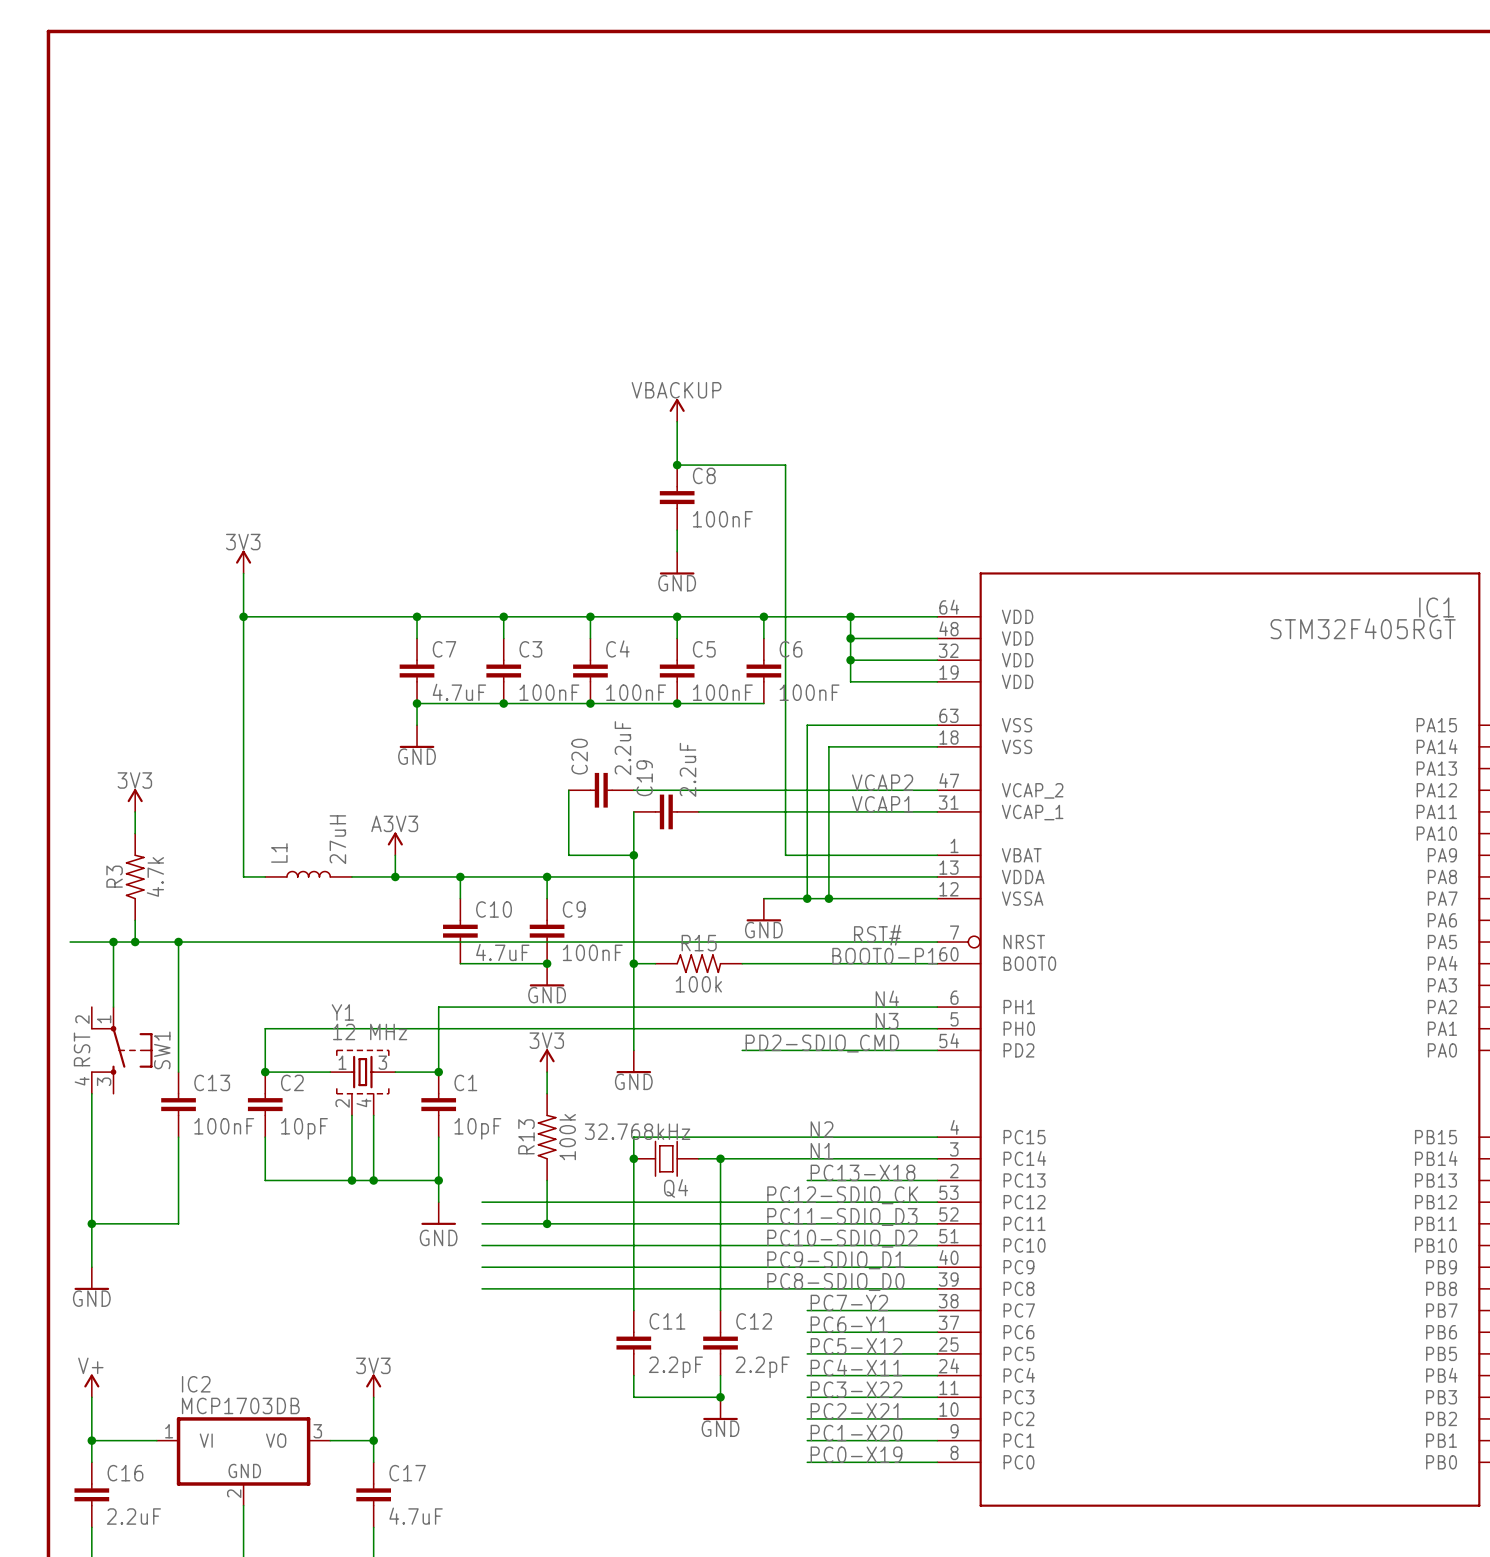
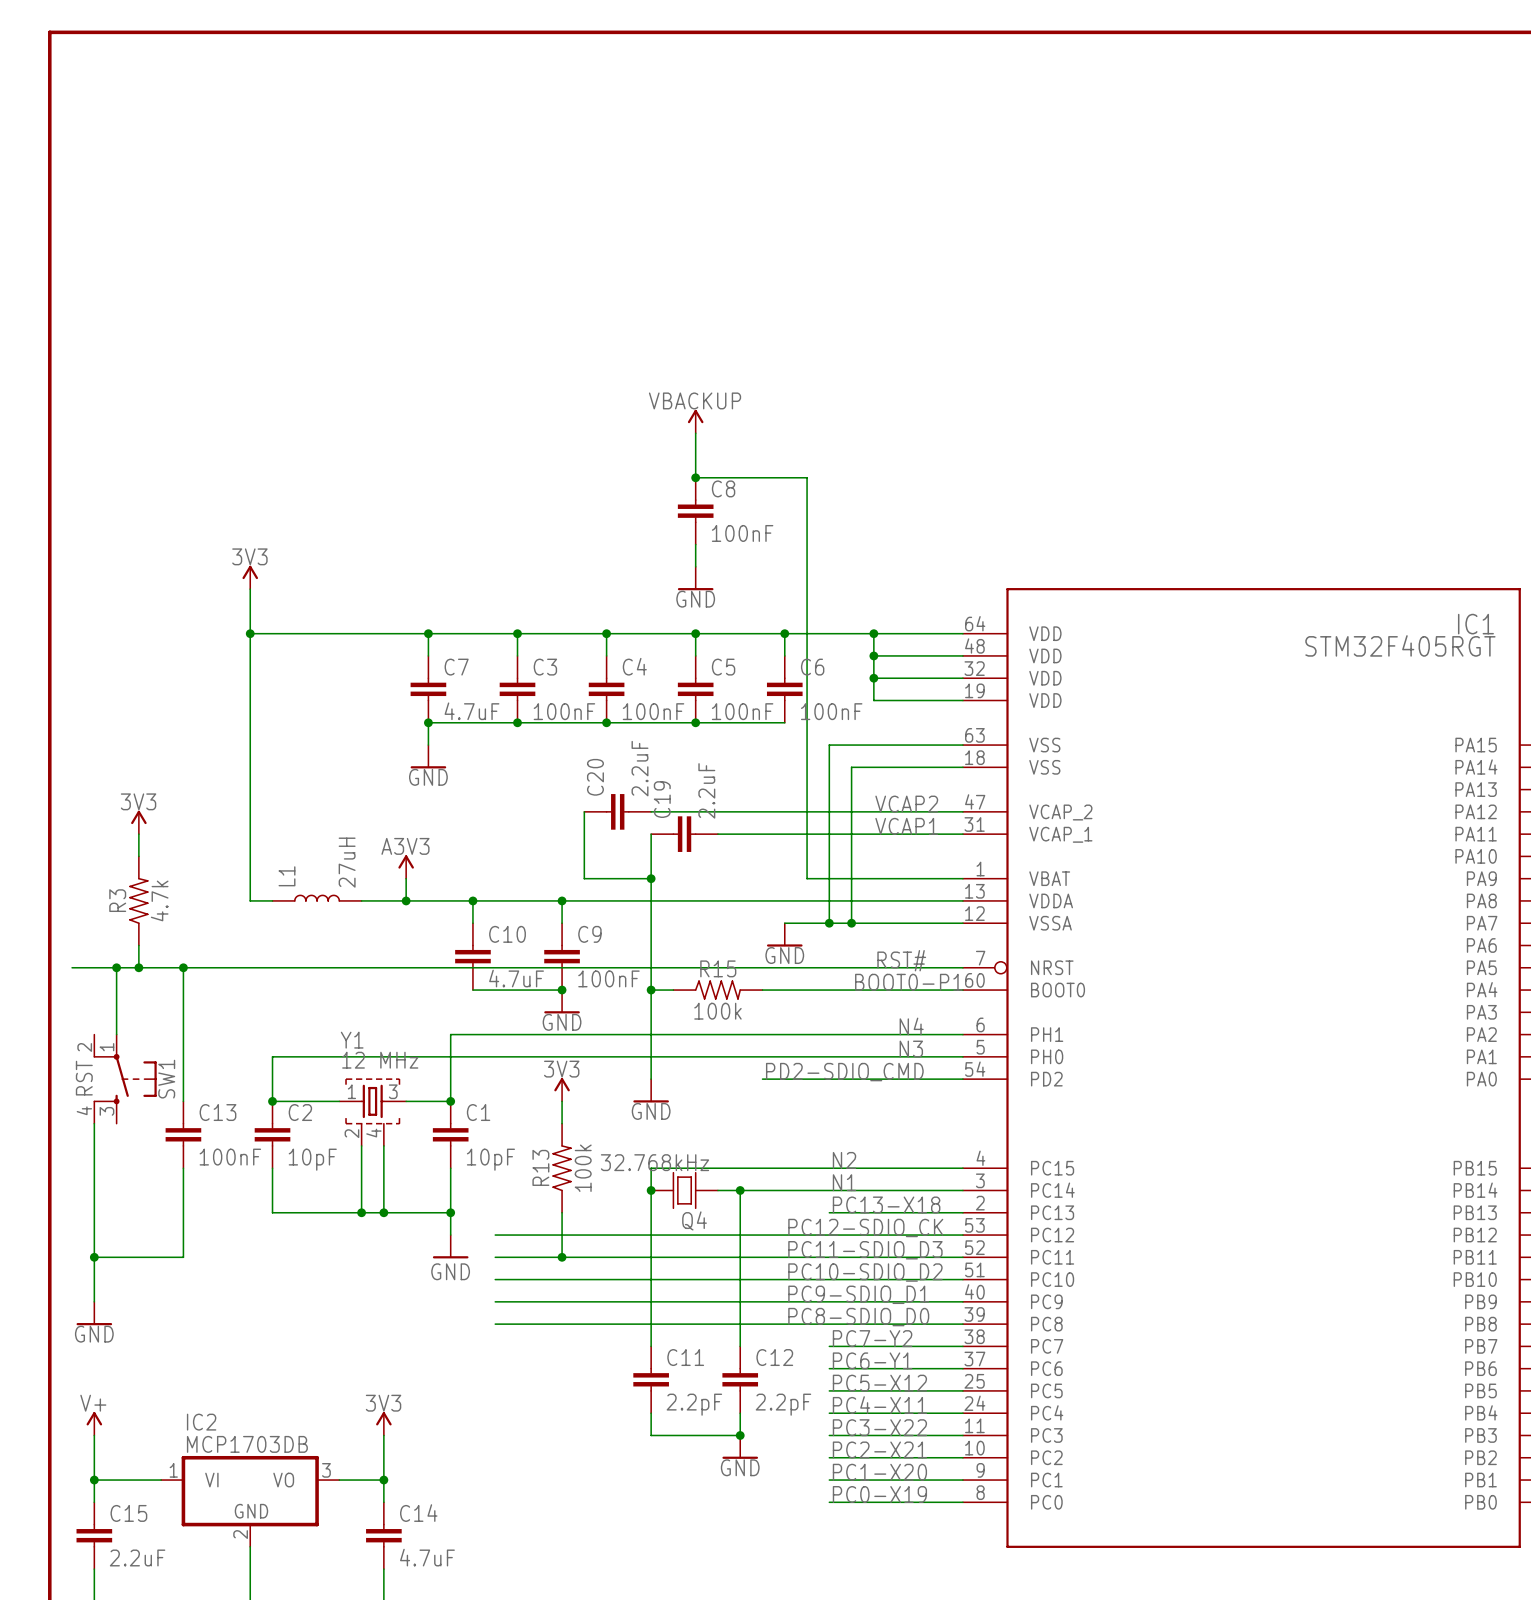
C16 name: C16 (125, 1473) -> C15 (128, 1513)
C17 name: C17 (407, 1473) -> C14 (418, 1513)

